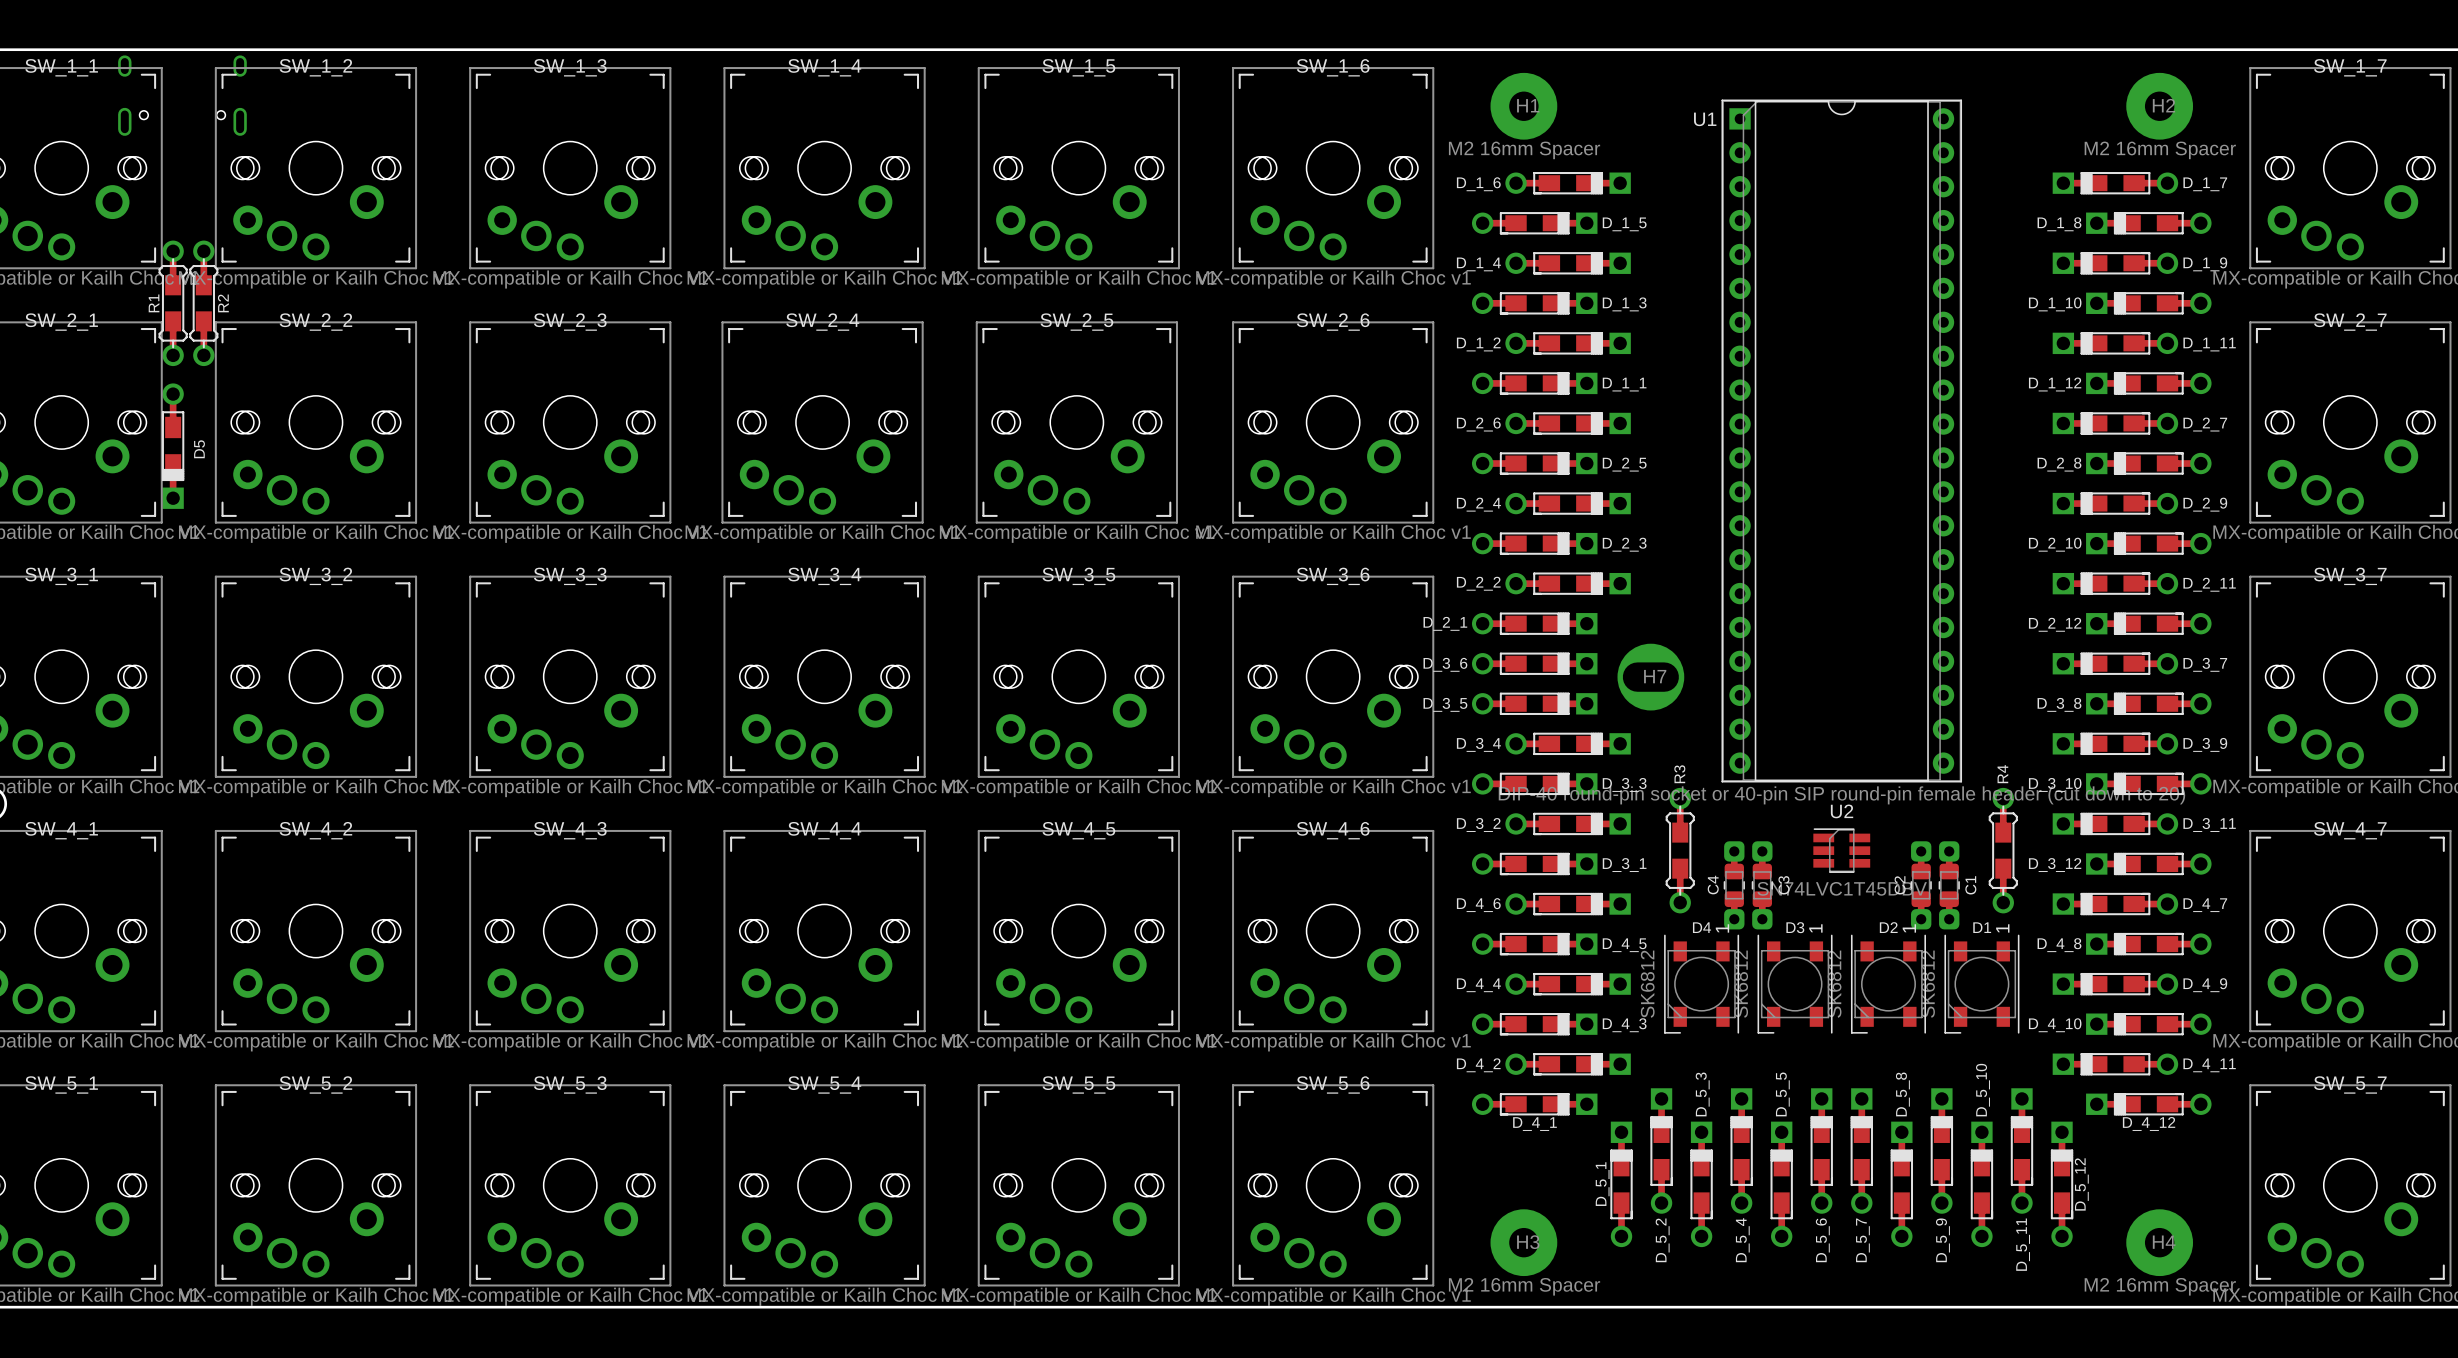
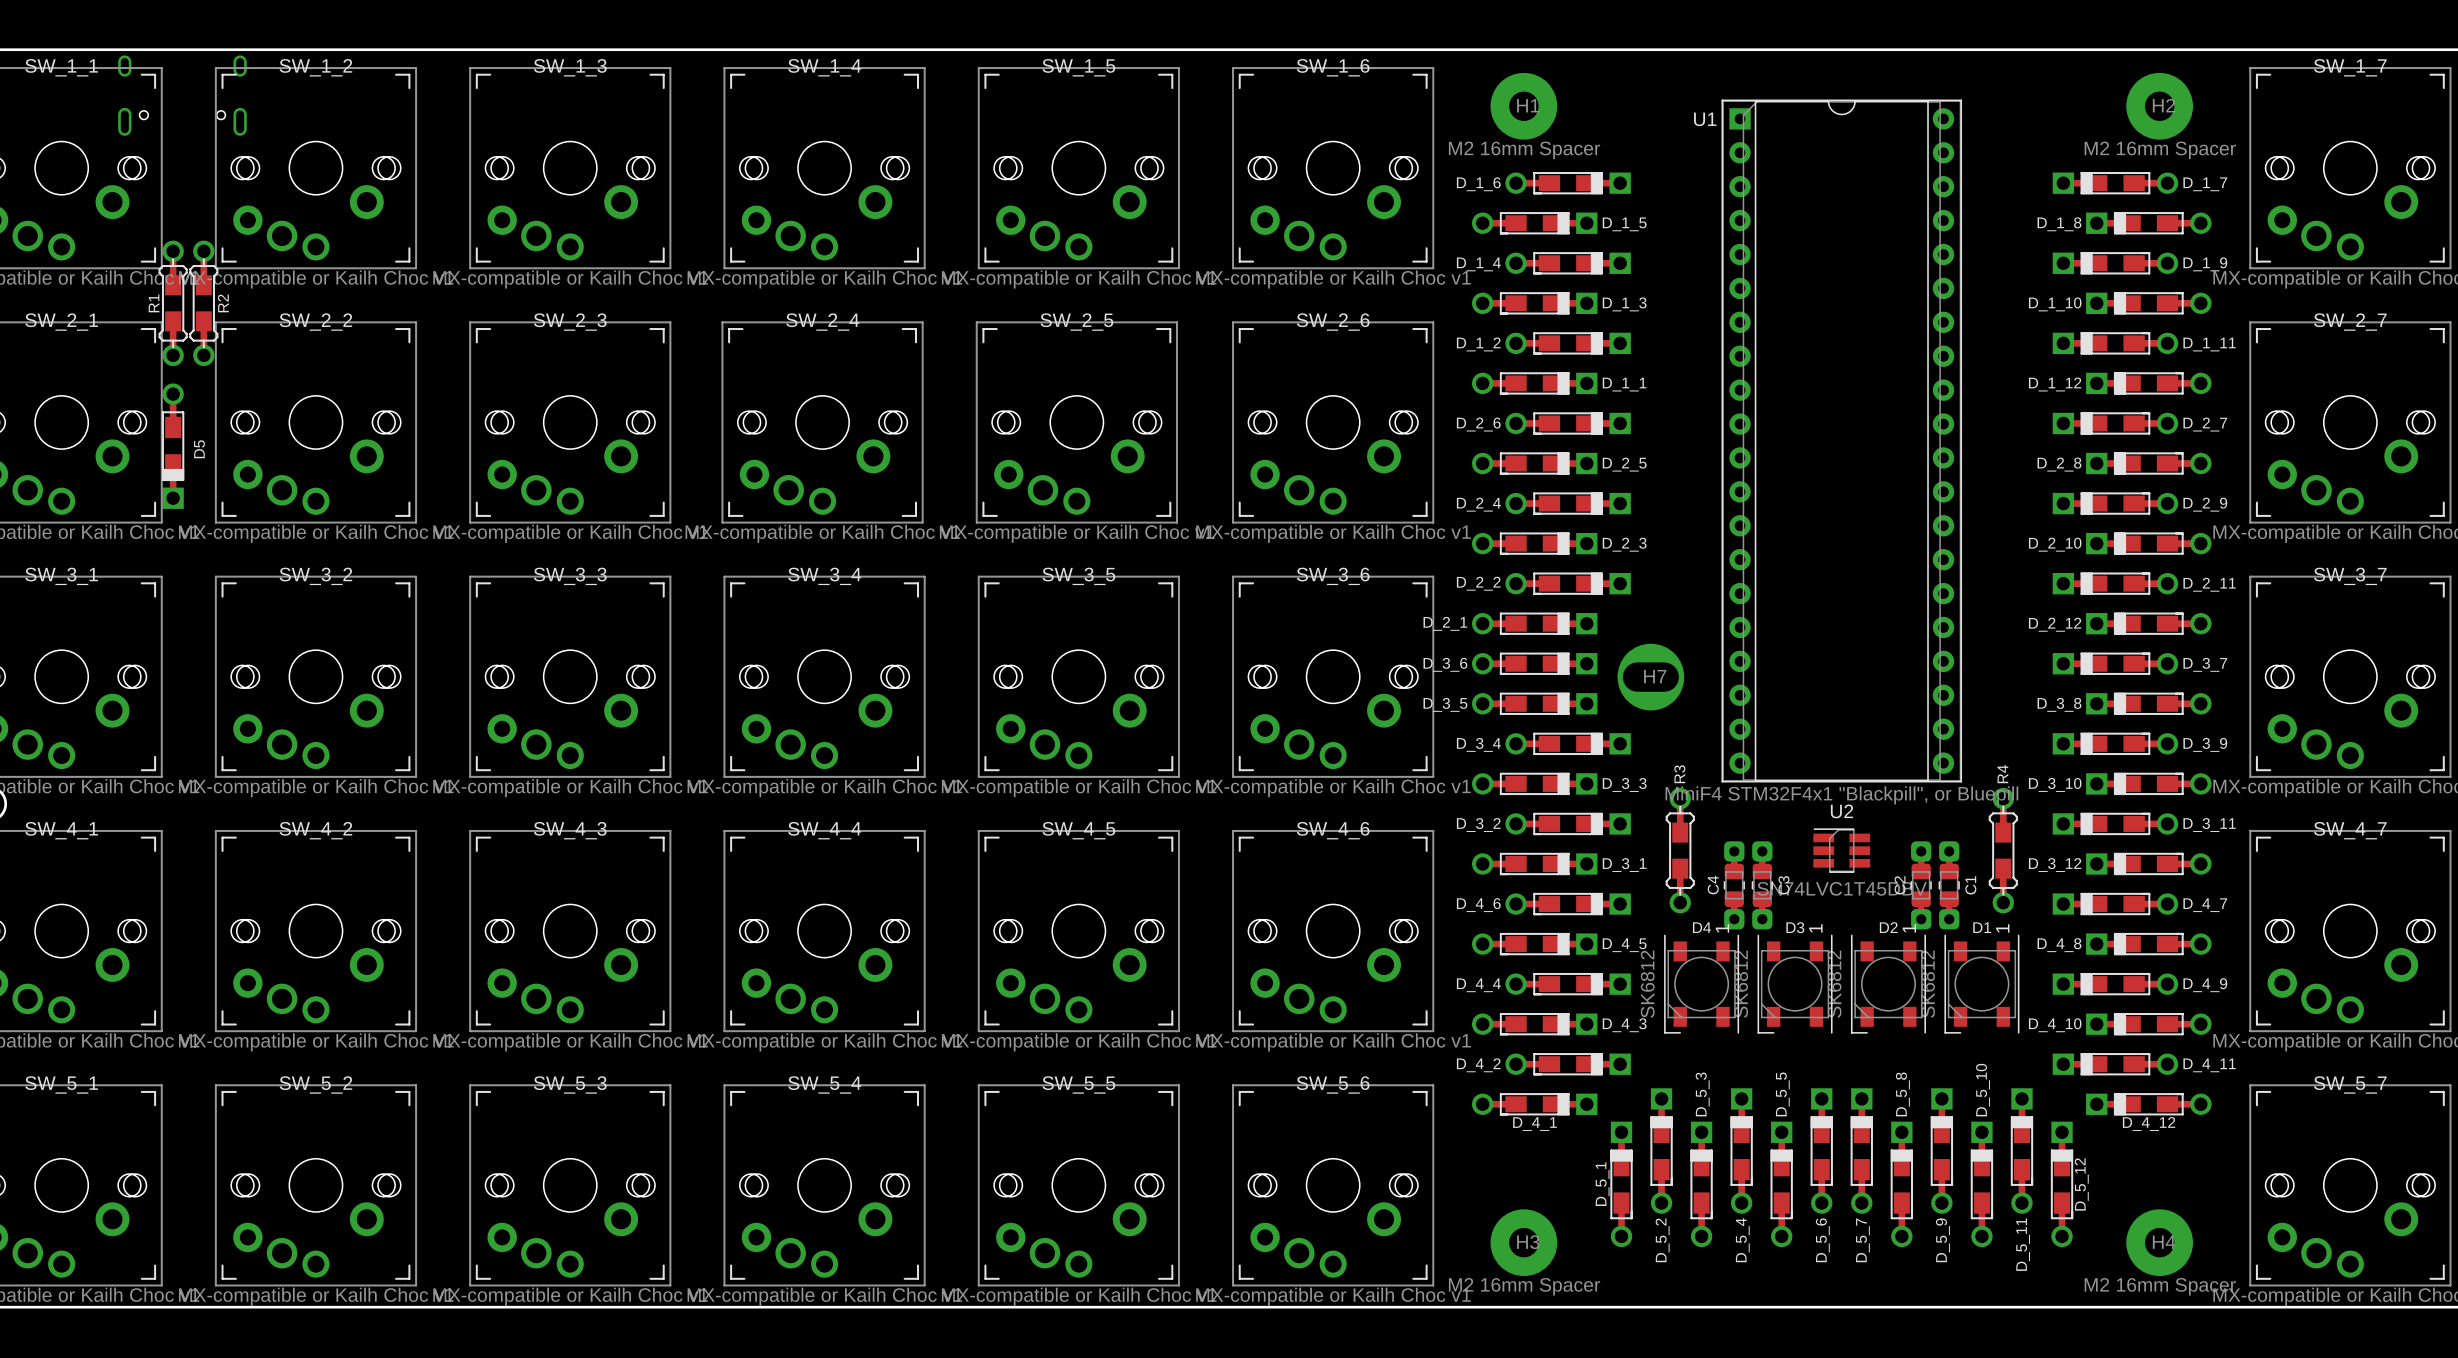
U1 value: DIP-40 round-pin socket or 40-pin SIP round-pin female header (cut down to 20) (1841, 795) -> MiniF4 STM32F4x1 "Blackpill", or Bluepill (1841, 795)

